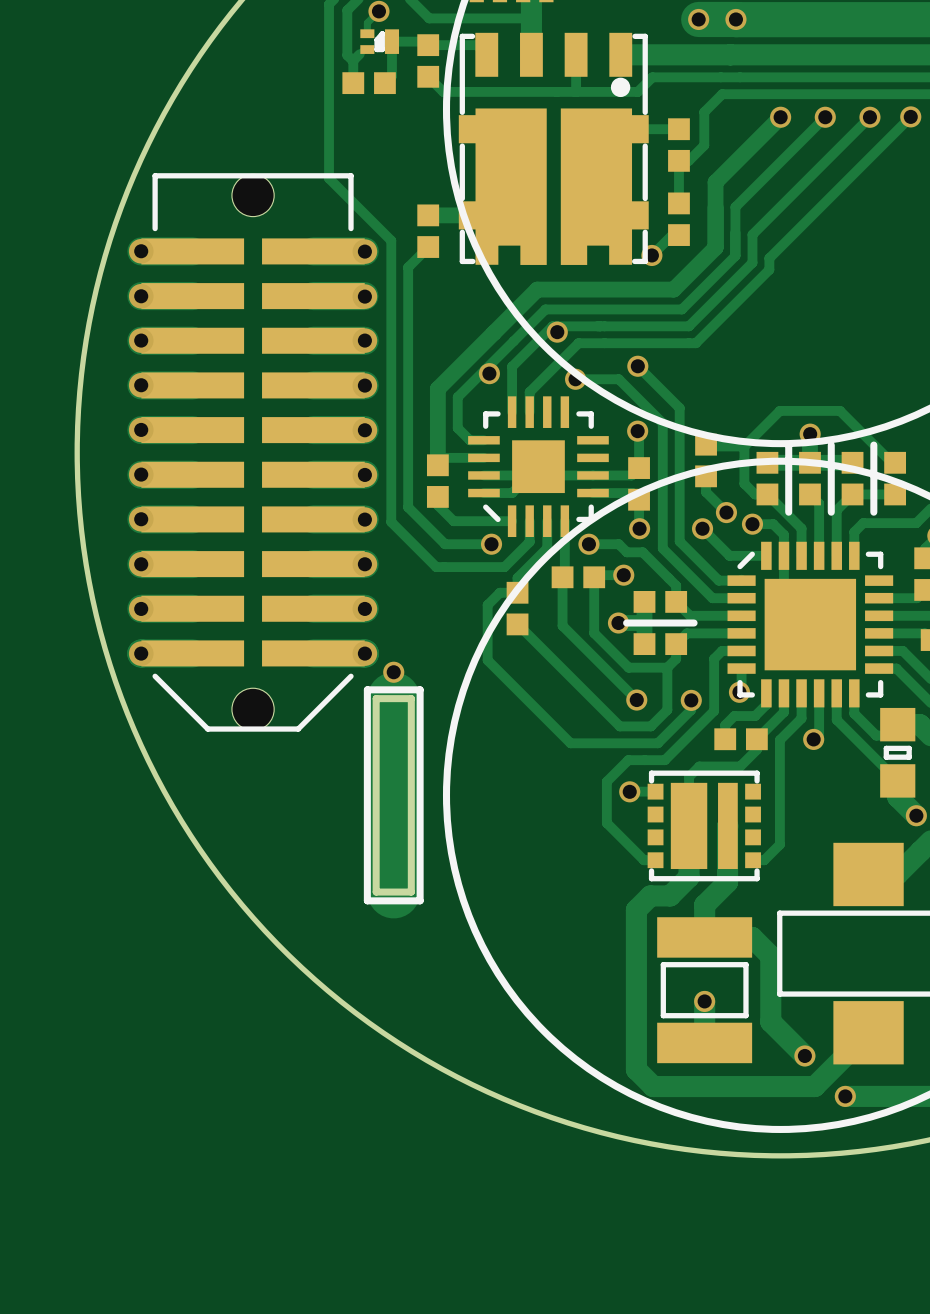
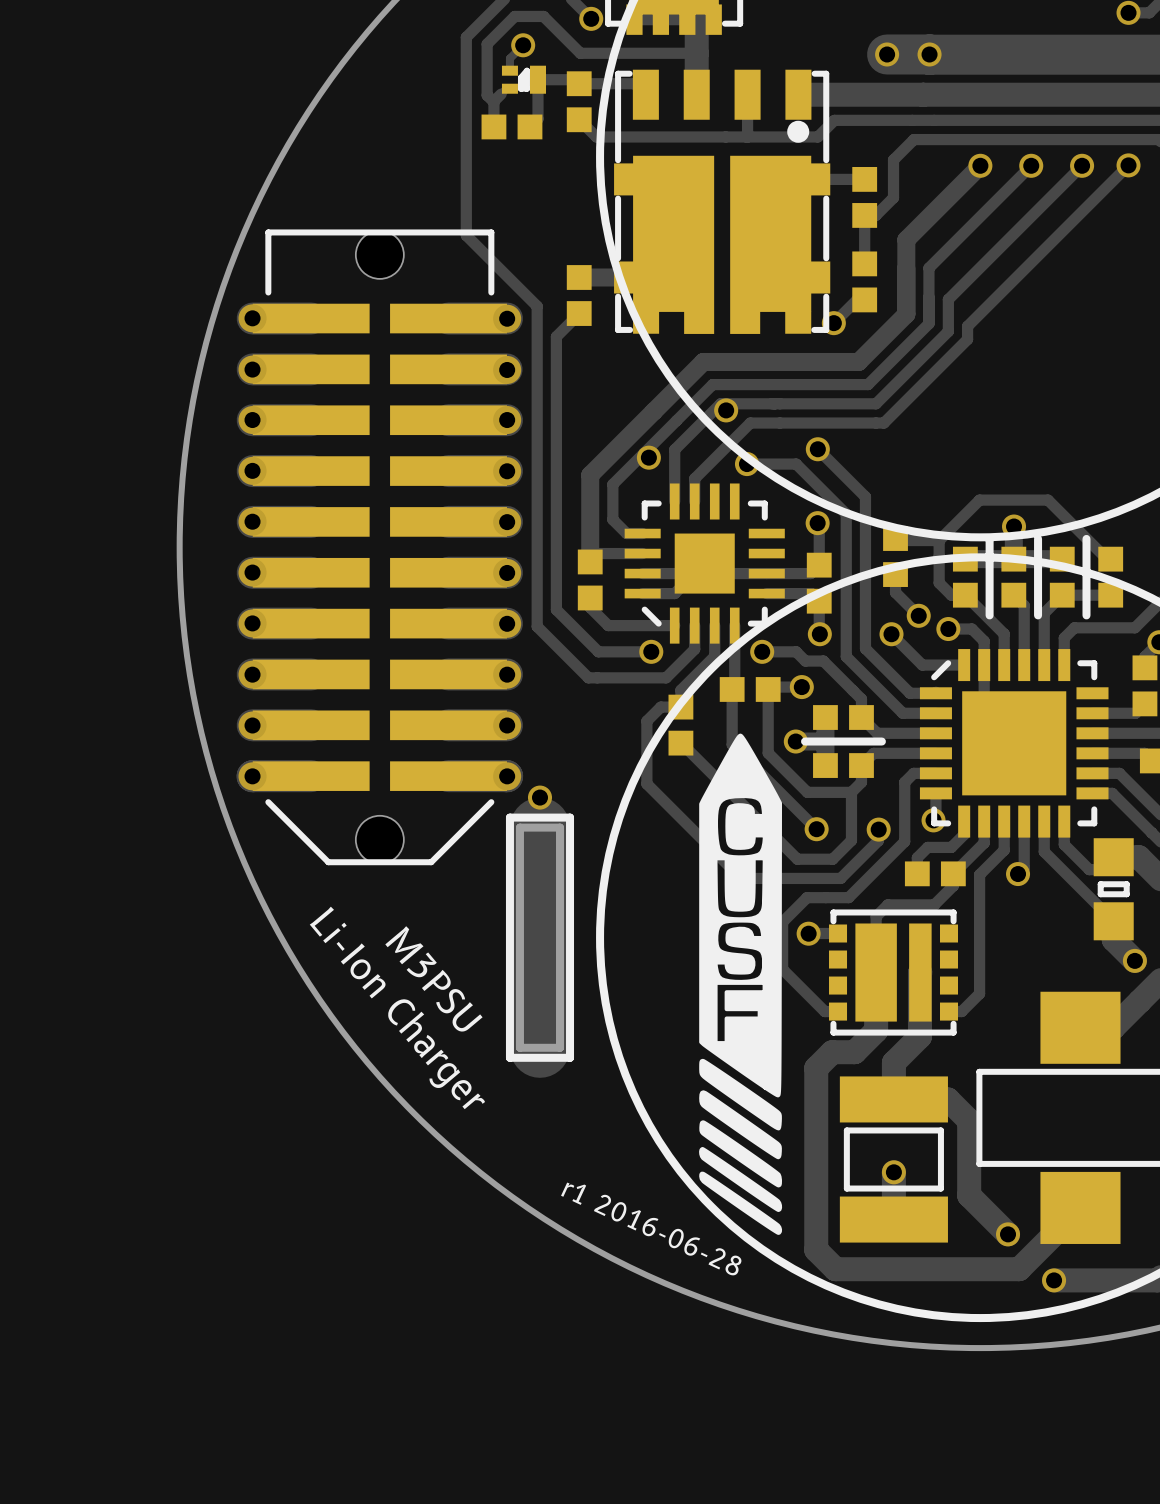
drawing: none -> [699, 733, 783, 1235]
text: none -> M3PSU (433, 978)
text: none -> Li-Ion Charger (397, 1007)
text: none -> r1 2016-06-28 (651, 1229)

